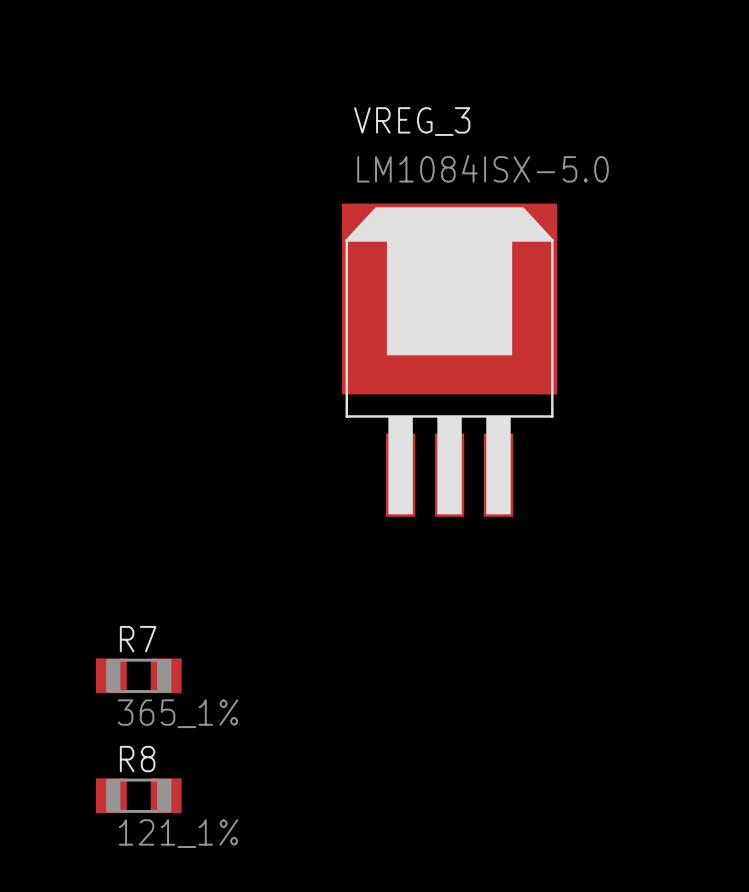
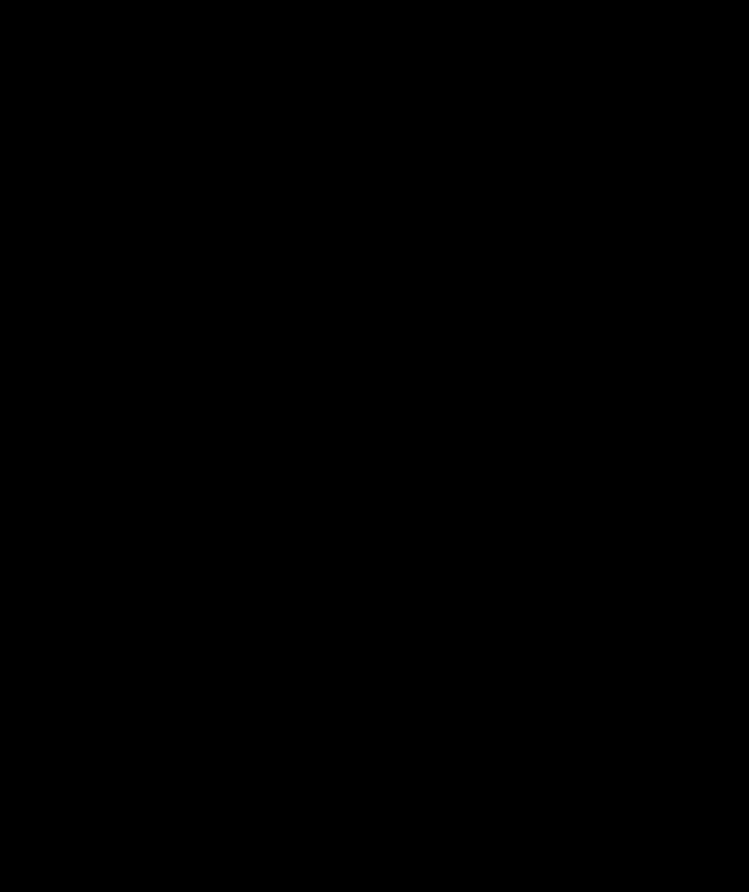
VREG_3: LM1084ISX-5.0 (449, 360) -> none
R7: 365_1% (138, 675) -> none
R8: 121_1% (138, 795) -> none

